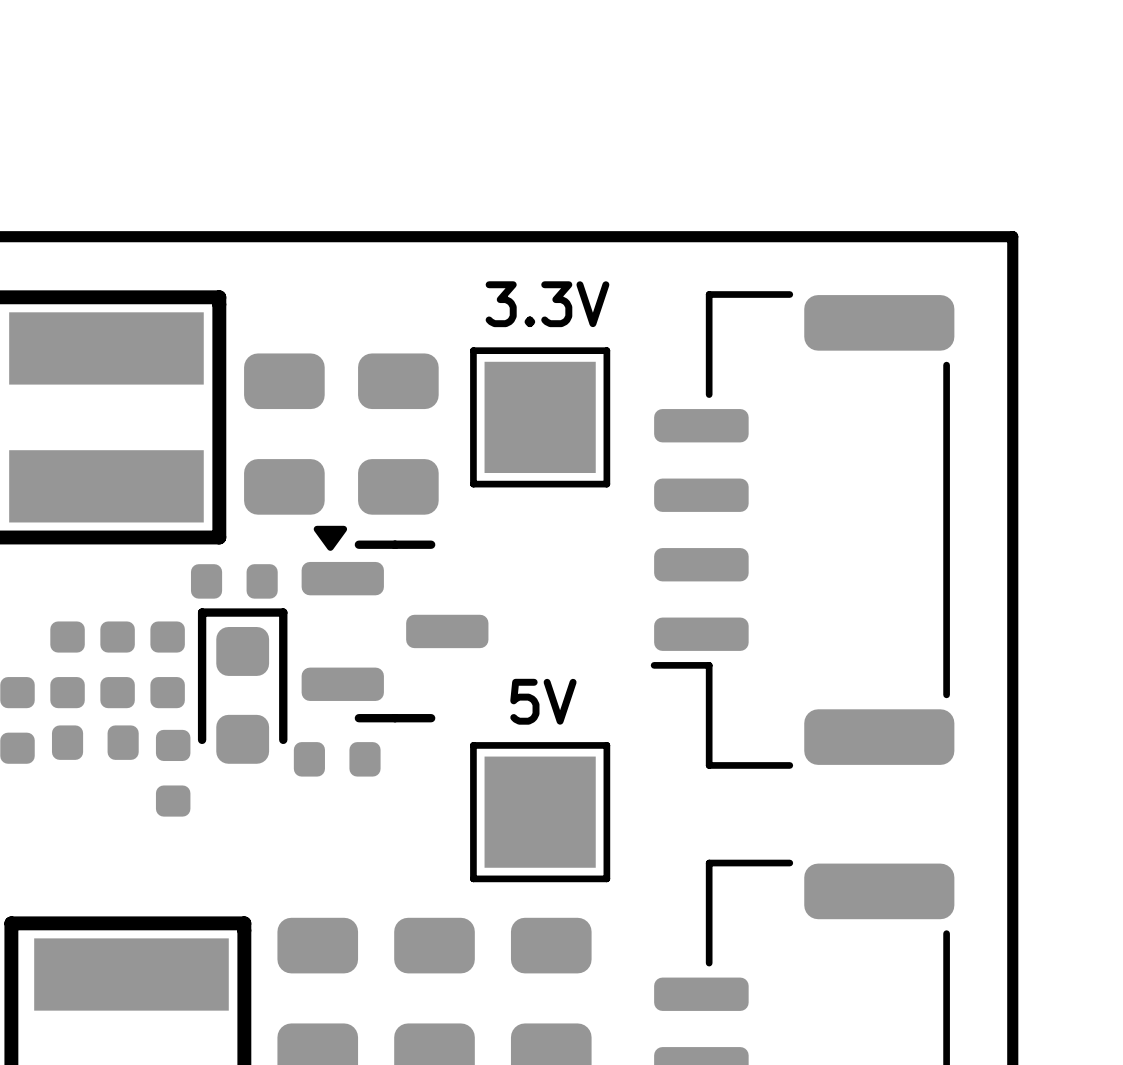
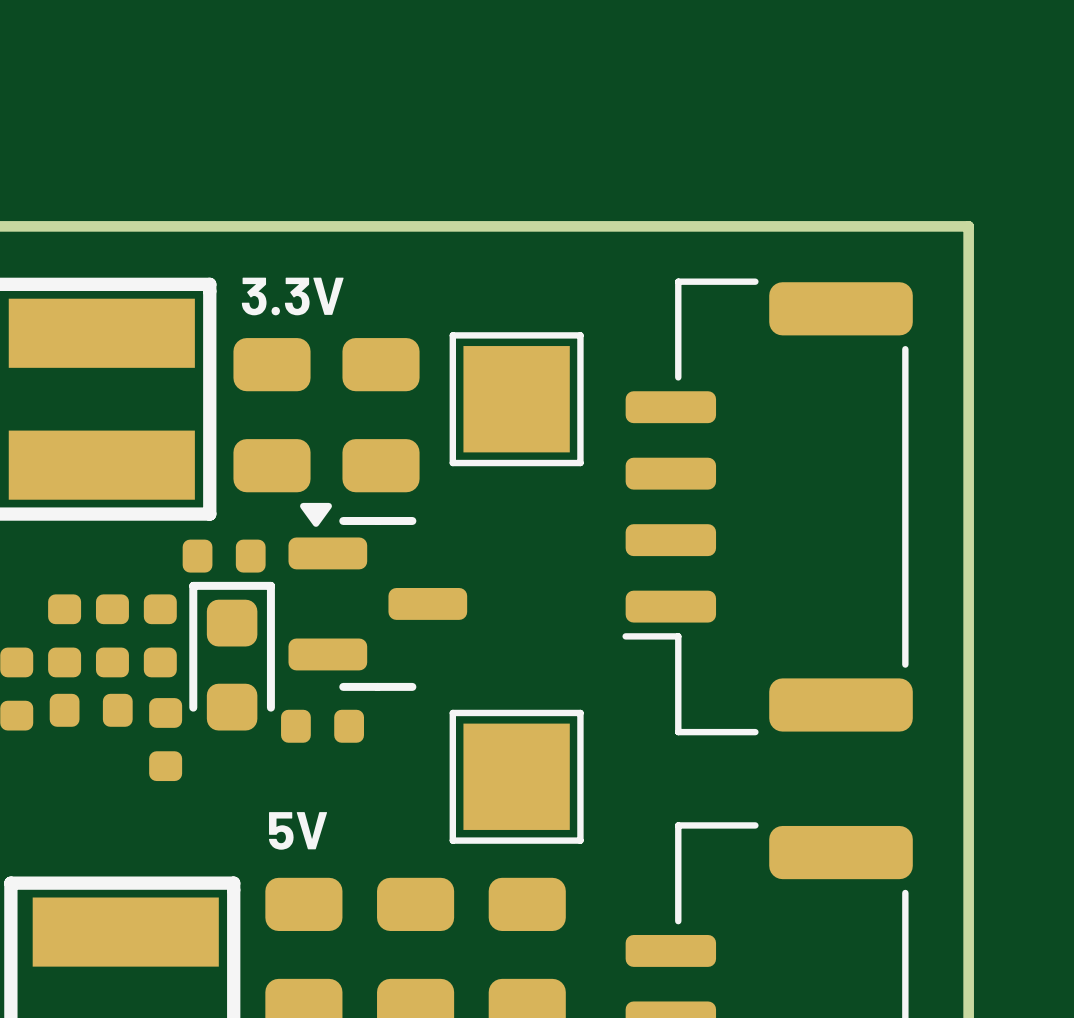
text position: 3.3V (547, 304) -> 3.3V (292, 296)
text position: 5V (543, 701) -> 5V (298, 830)

